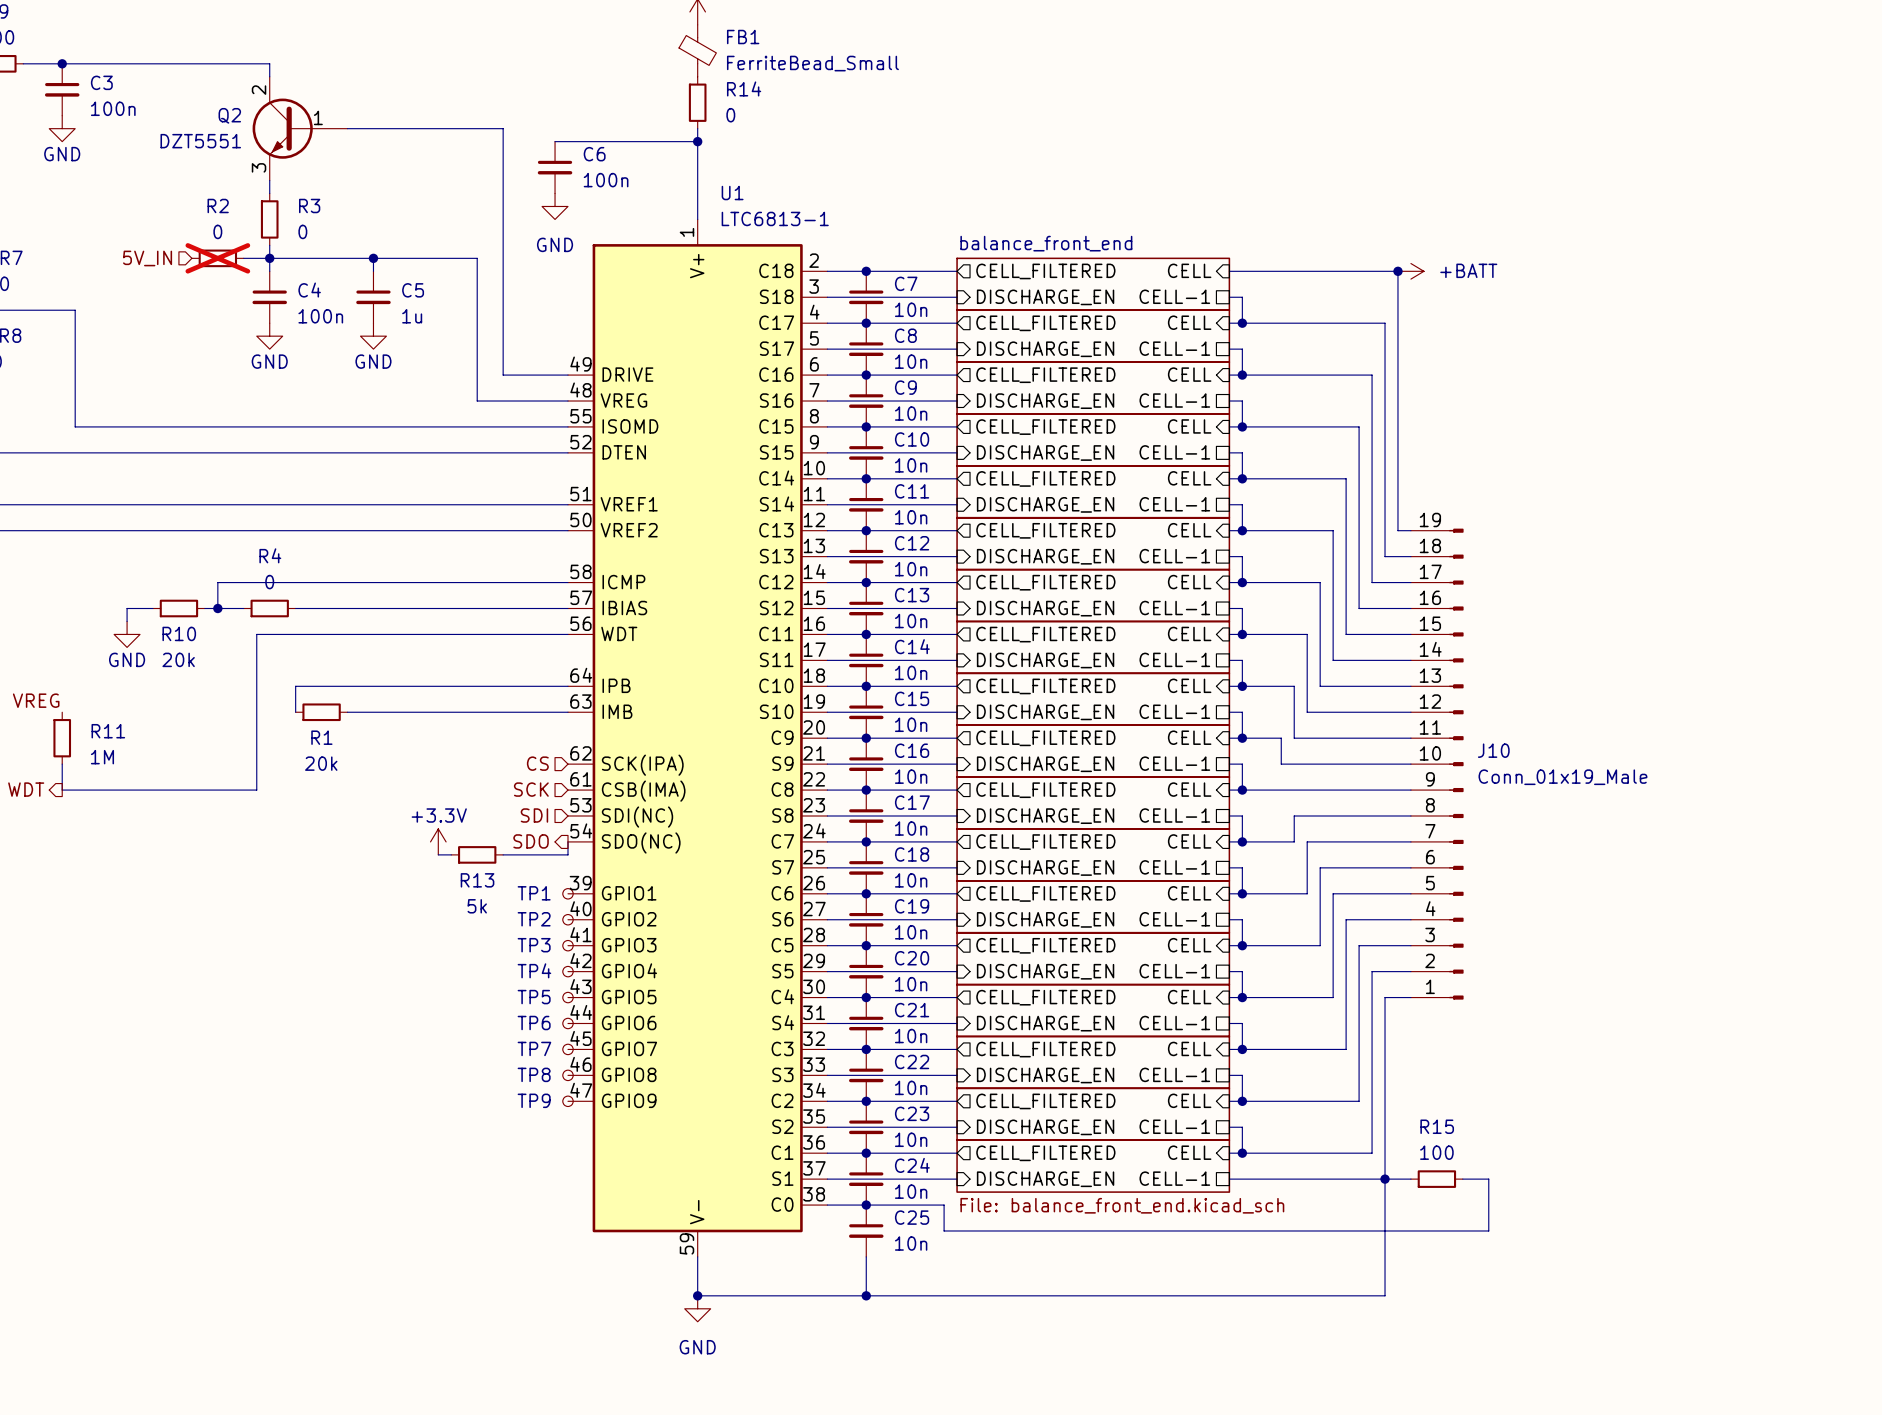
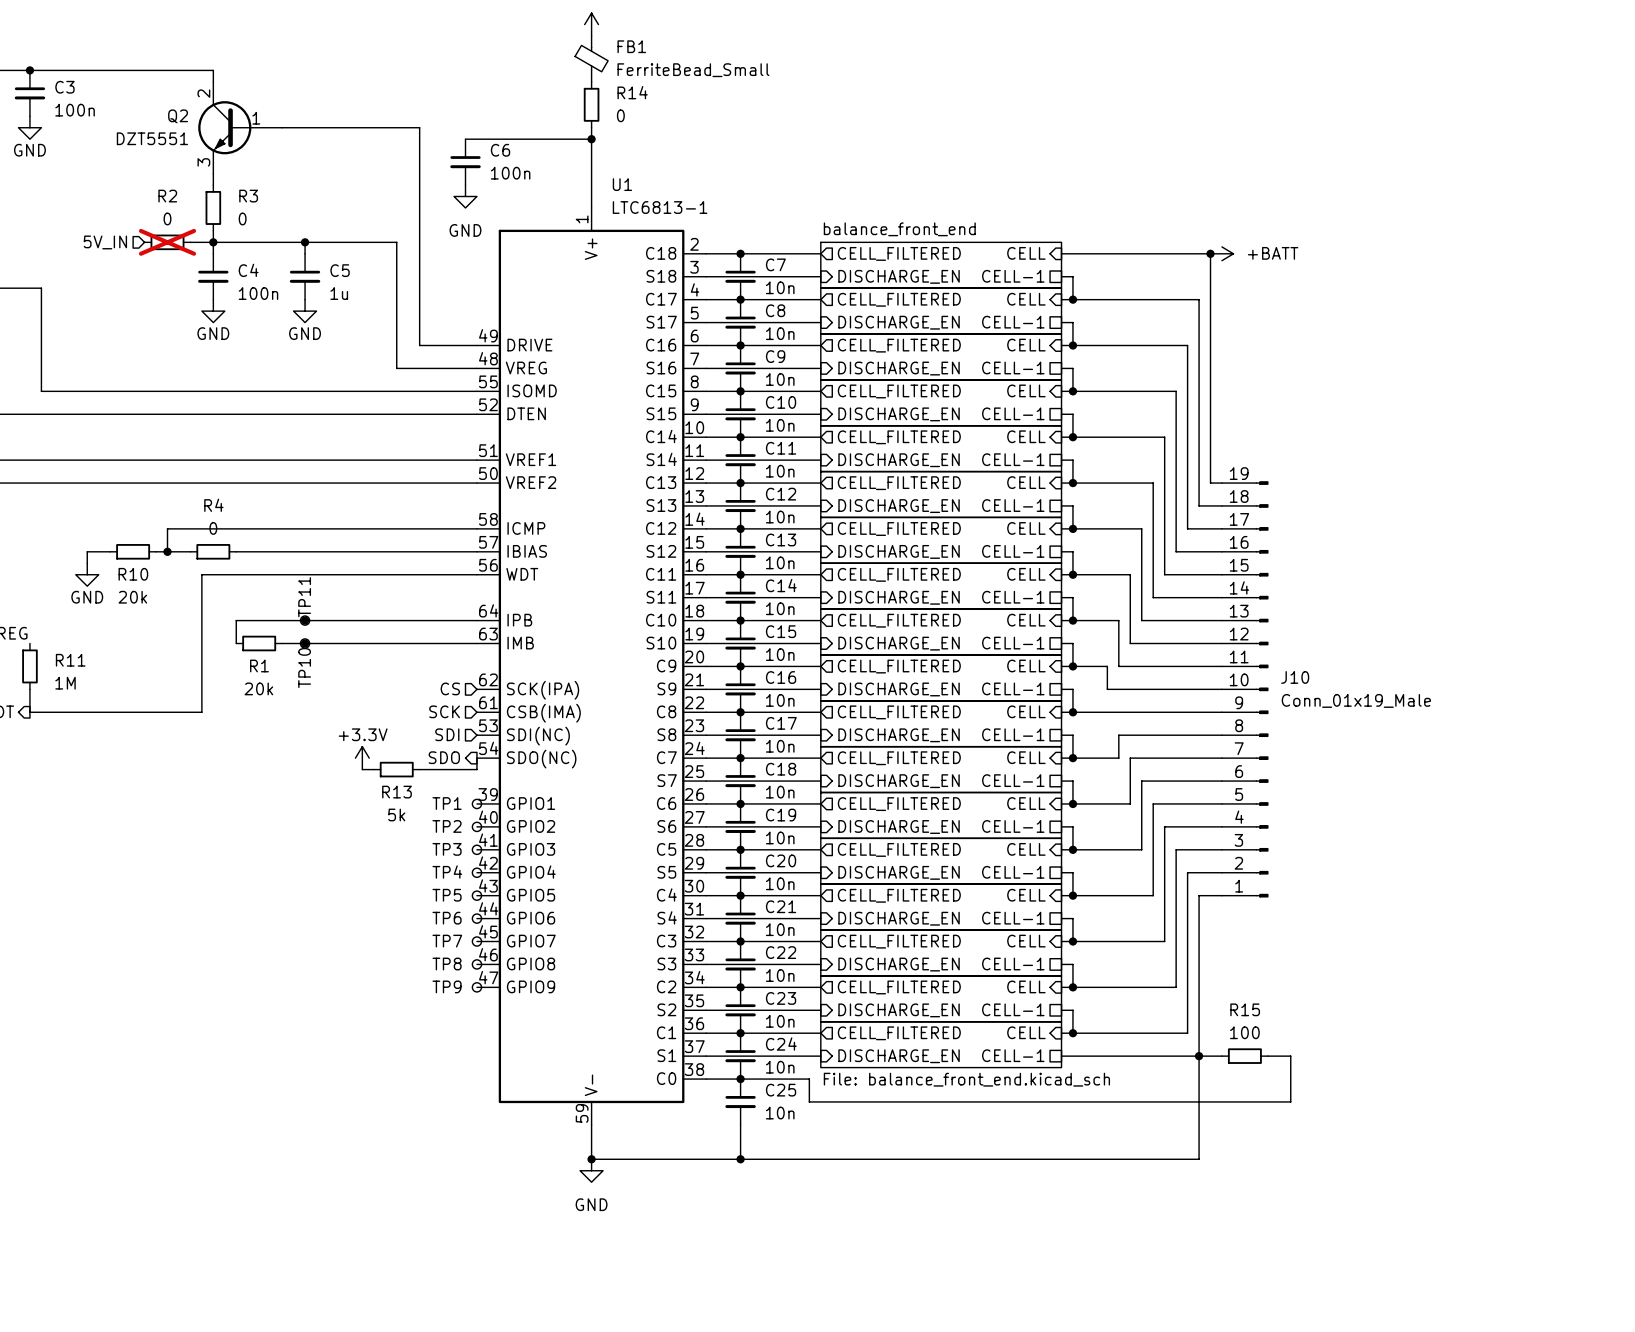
junction: none -> (305, 620)
TP11: none -> (305, 620)
junction: none -> (305, 643)
TP10: none -> (305, 643)

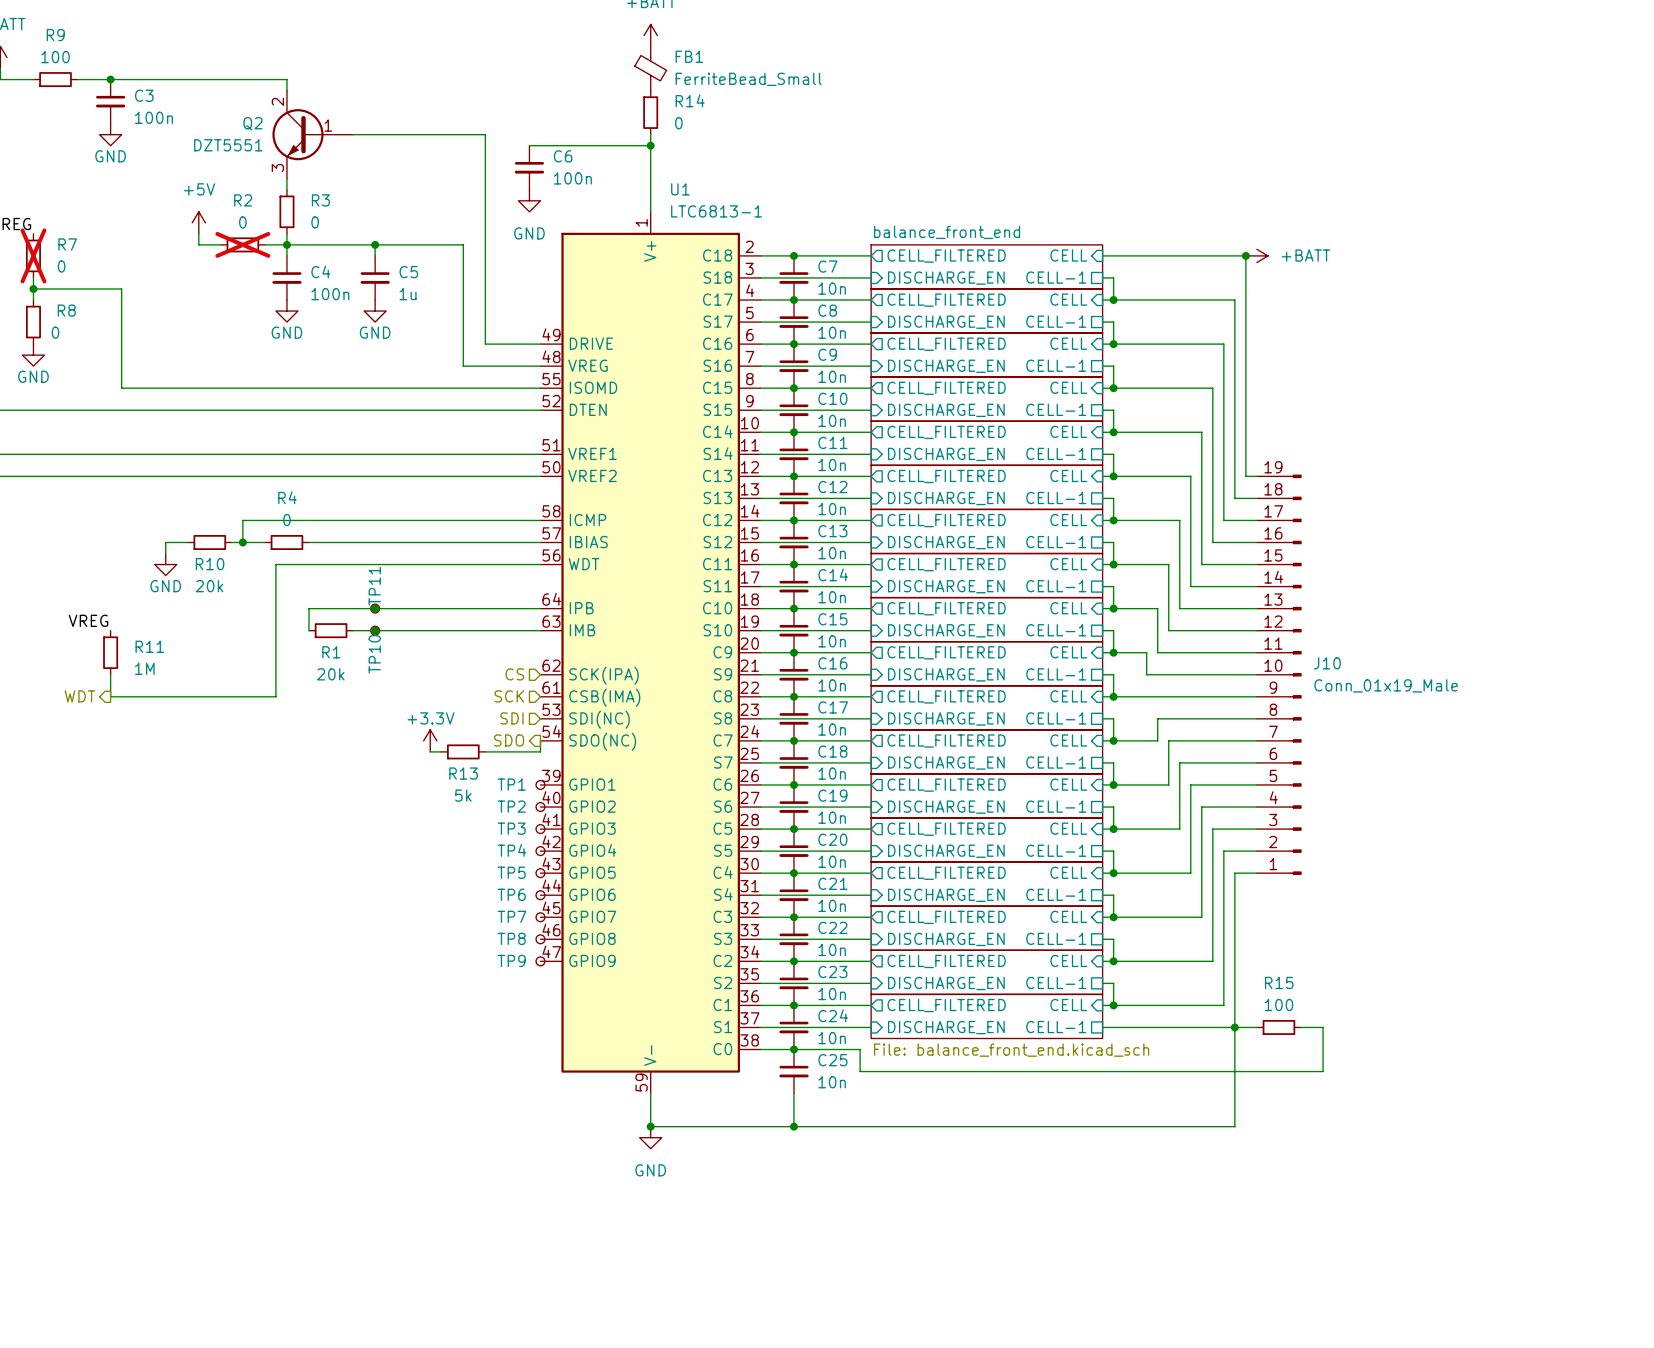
power symbol: none -> +5V (198, 222)
wire: none -> (198, 233) (198, 244) (220, 244)
hierarchical label: 5V_IN (105, 242) -> none

